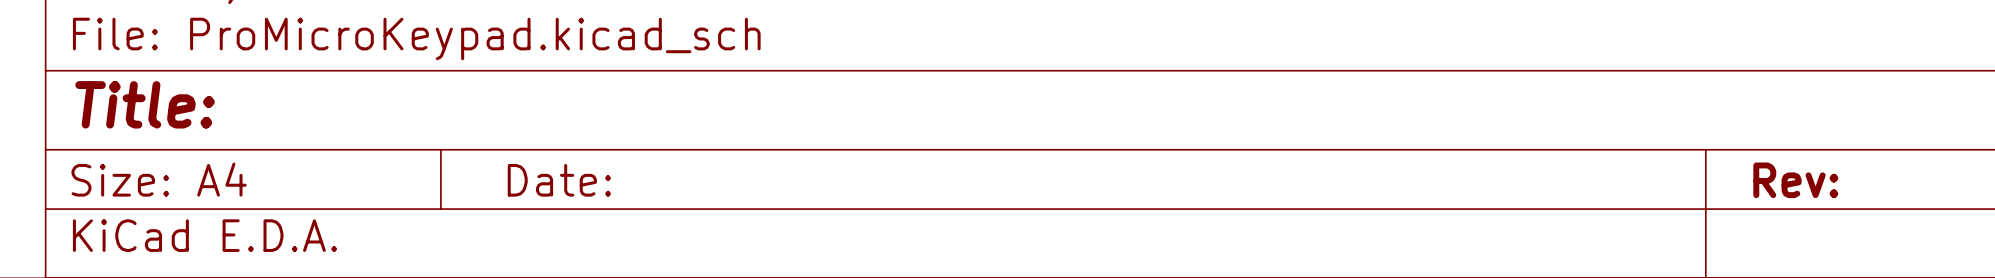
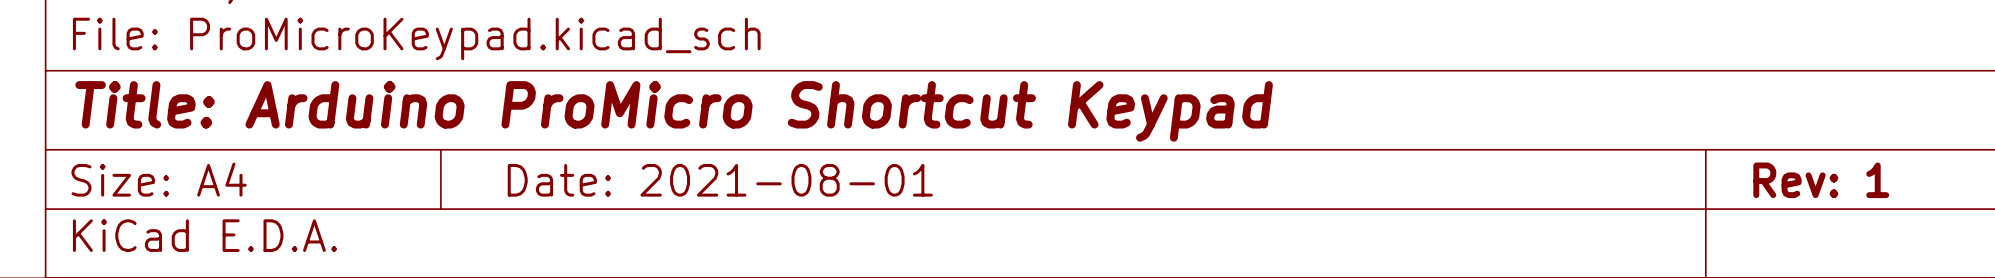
title block: Title: (145, 104) -> Title: Arduino ProMicro Shortcut Keypad (674, 111)
title block: Date: (559, 180) -> Date: 2021-08-01 (720, 180)
title block: Rev: (1795, 180) -> Rev: 1 (1821, 180)

